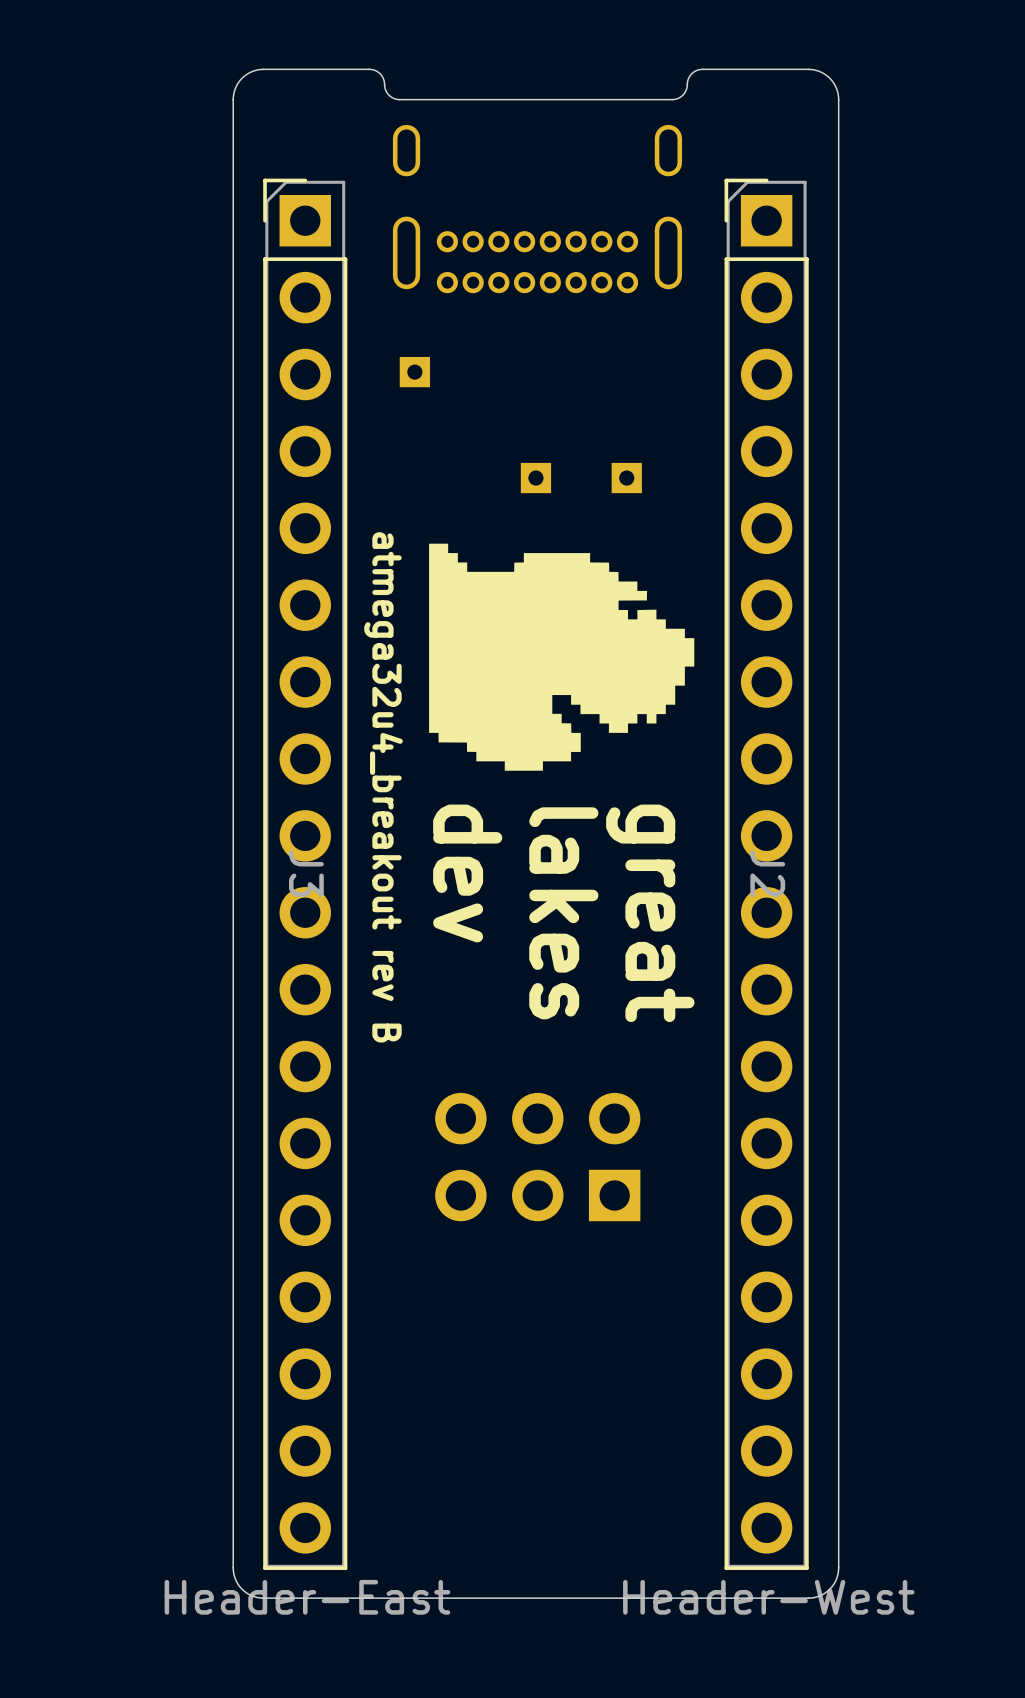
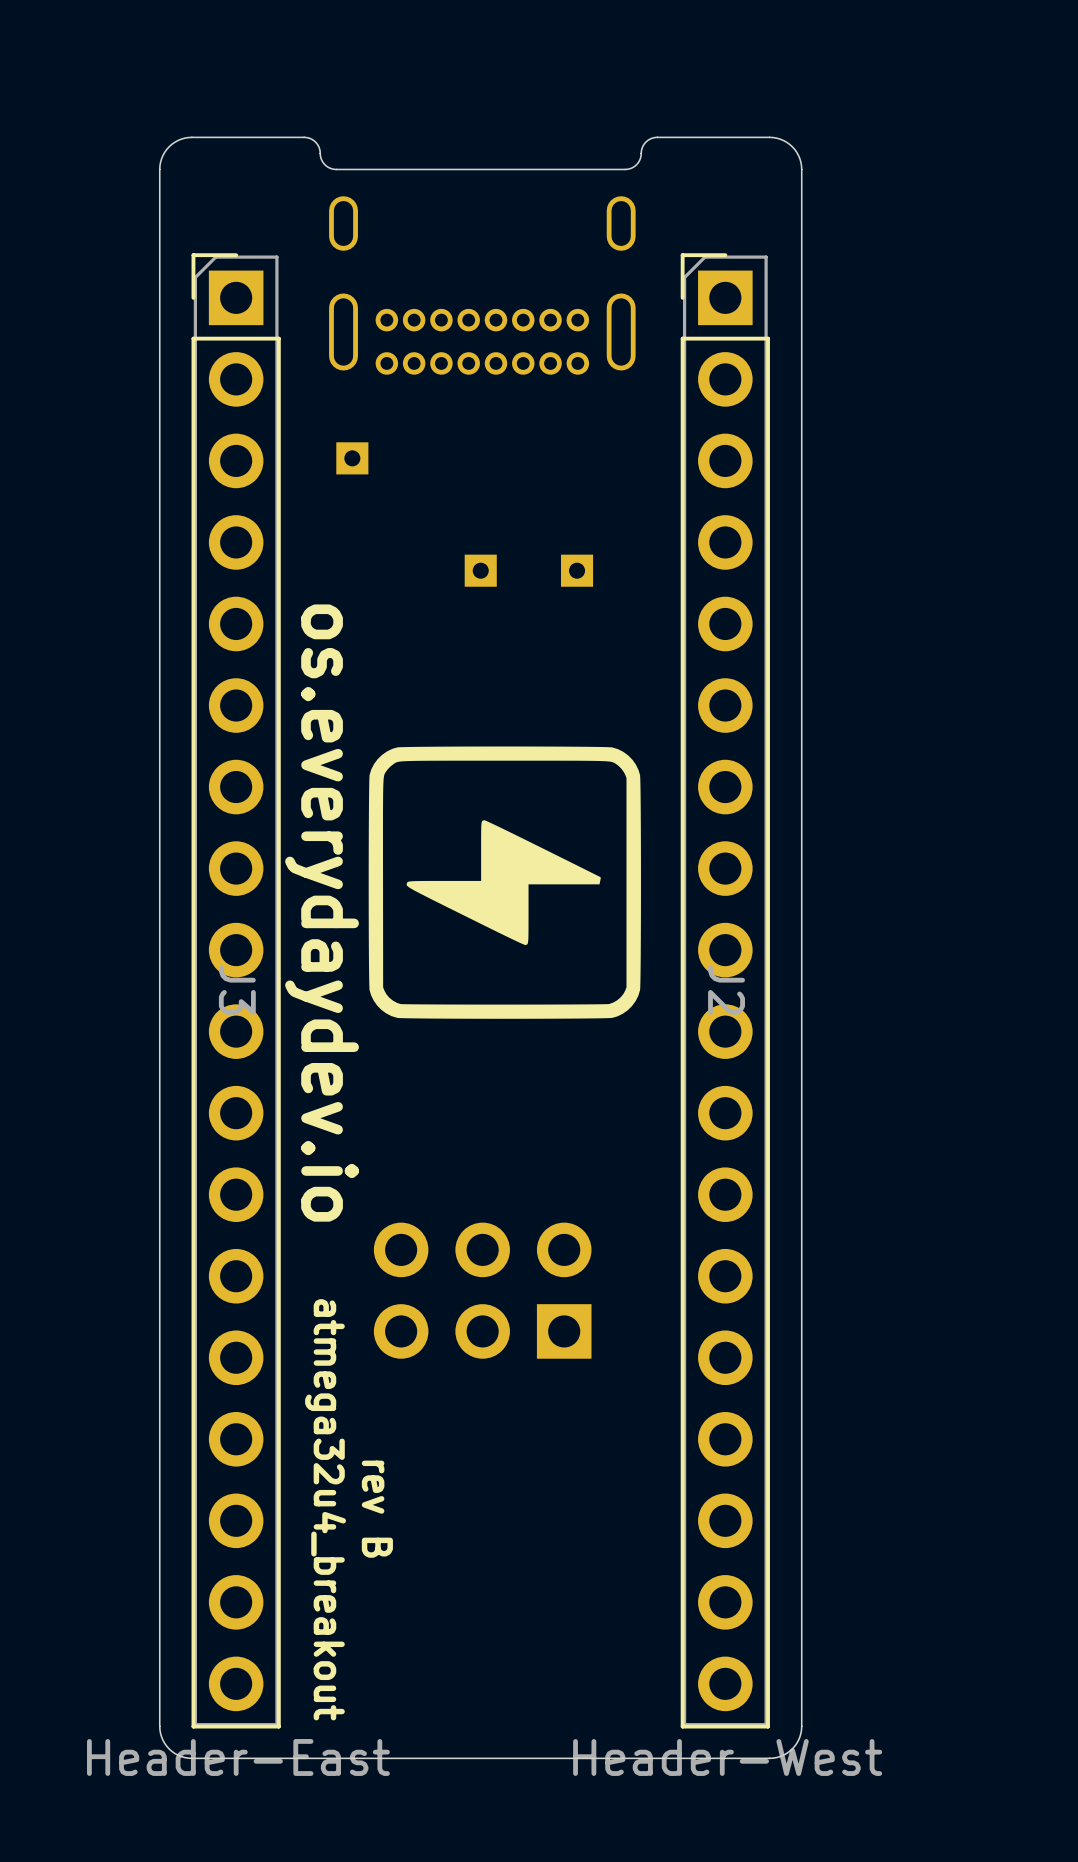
drawing: [429, 543, 695, 771] -> none
drawing: none -> [368, 746, 641, 1019]
text: atmega32u4_breakout rev B (383, 787) -> none
text: none -> os.everydaydev.io (322, 913)
text: none -> atmega32u4_breakout (325, 1509)
text: none -> rev B (377, 1509)

